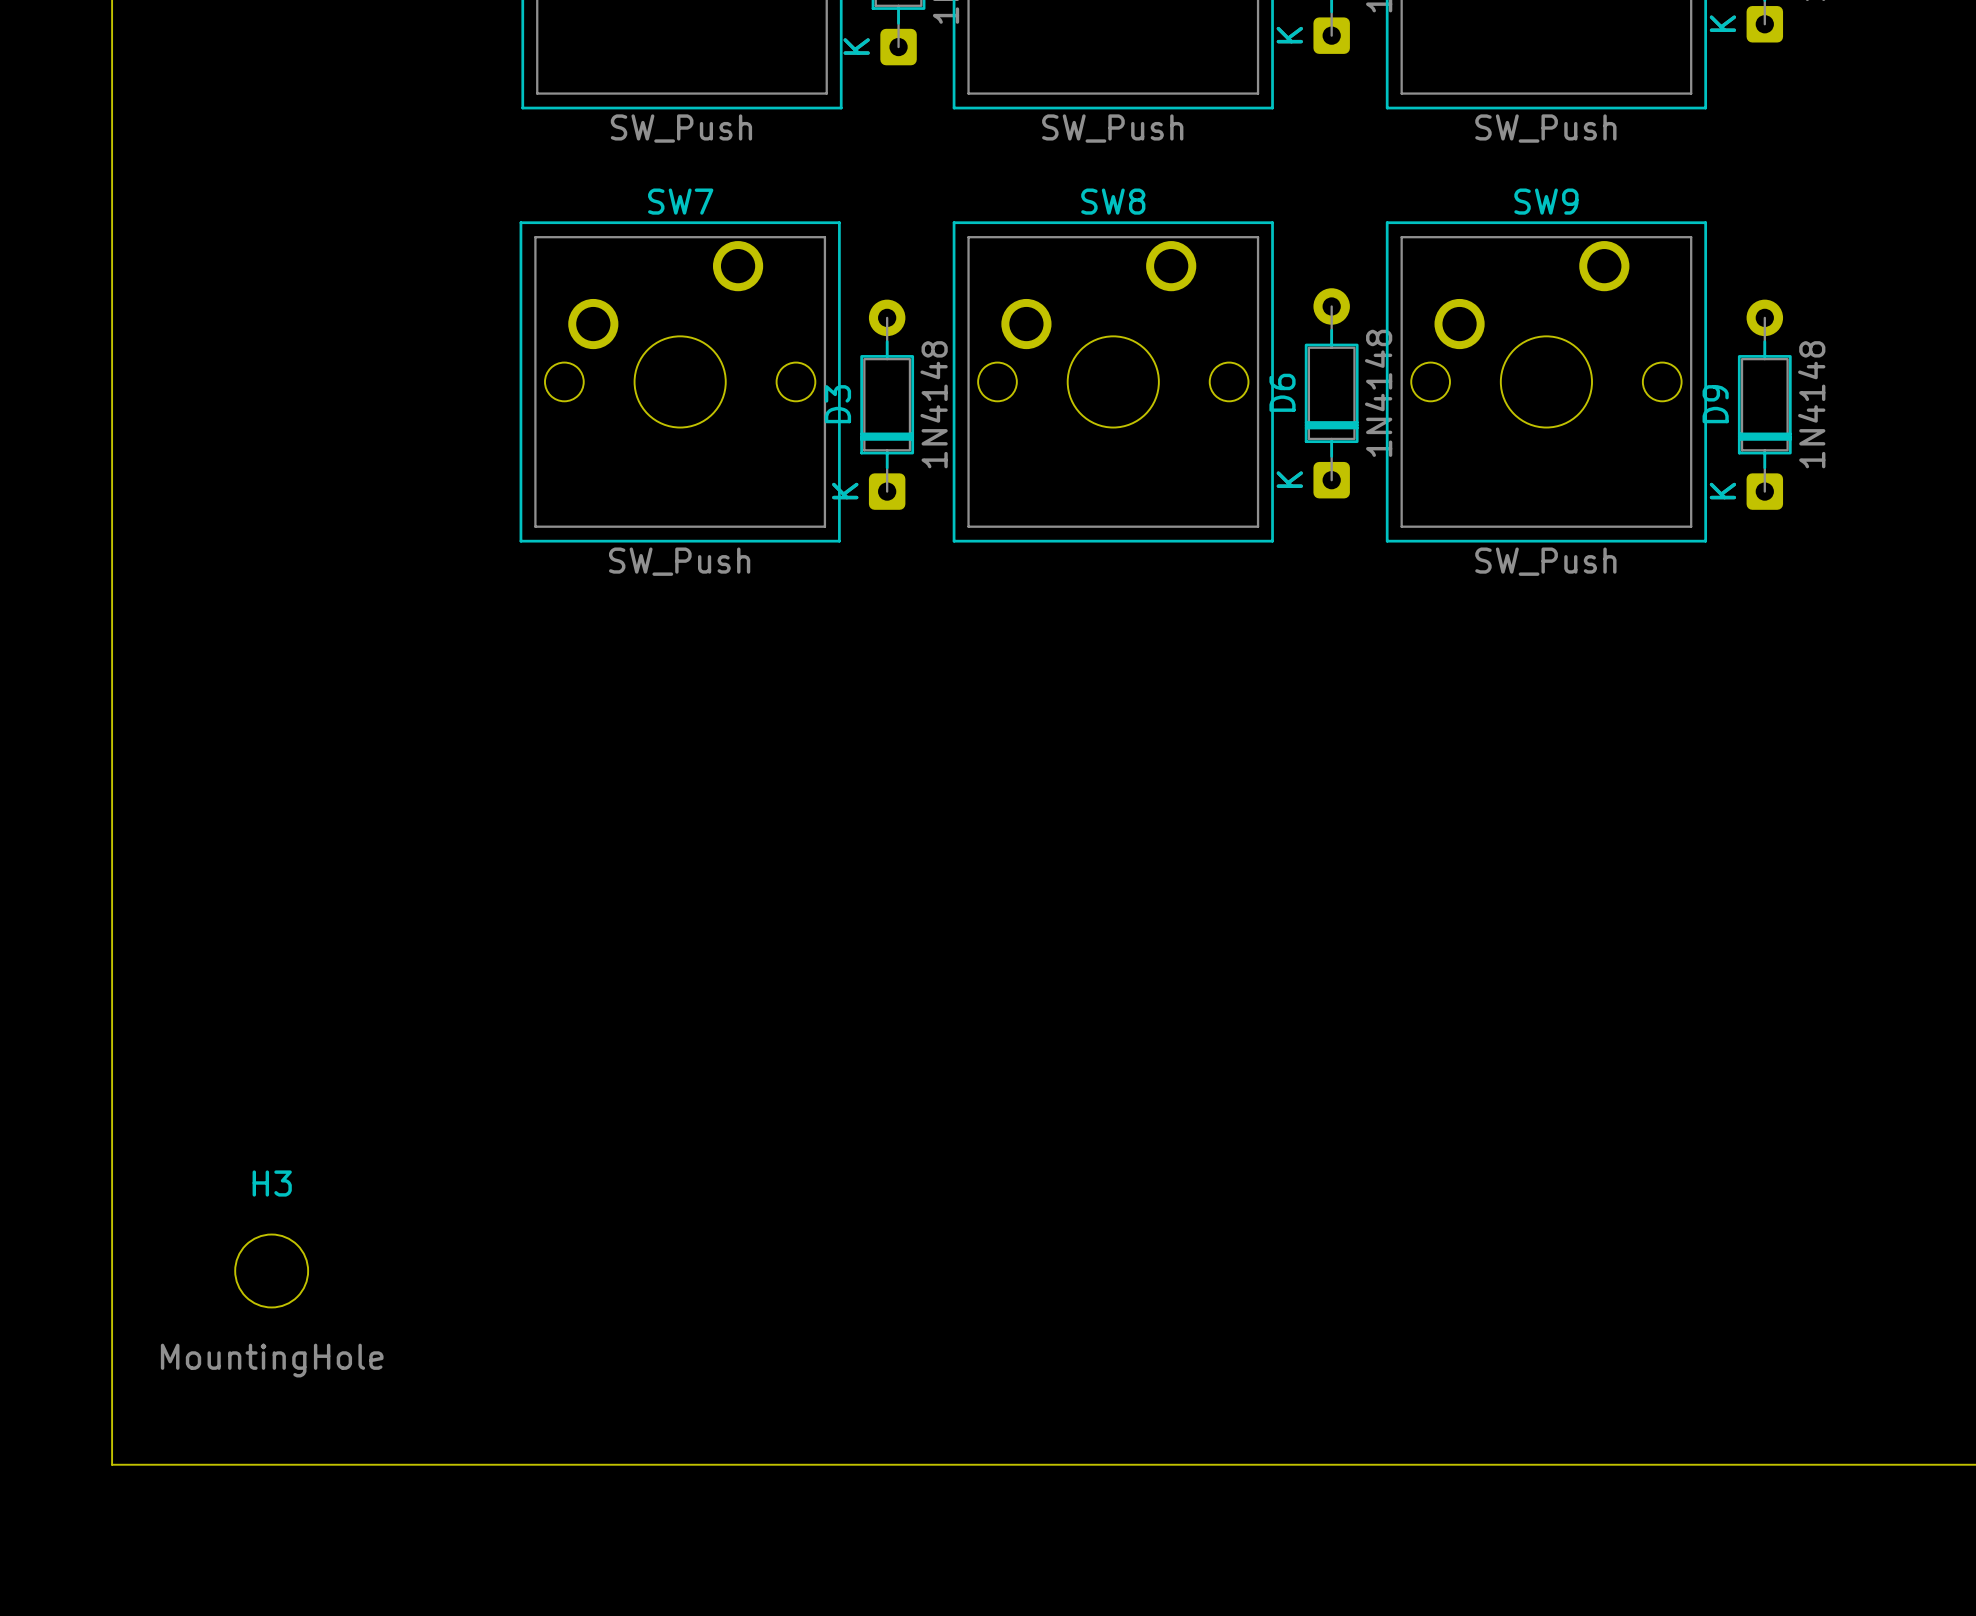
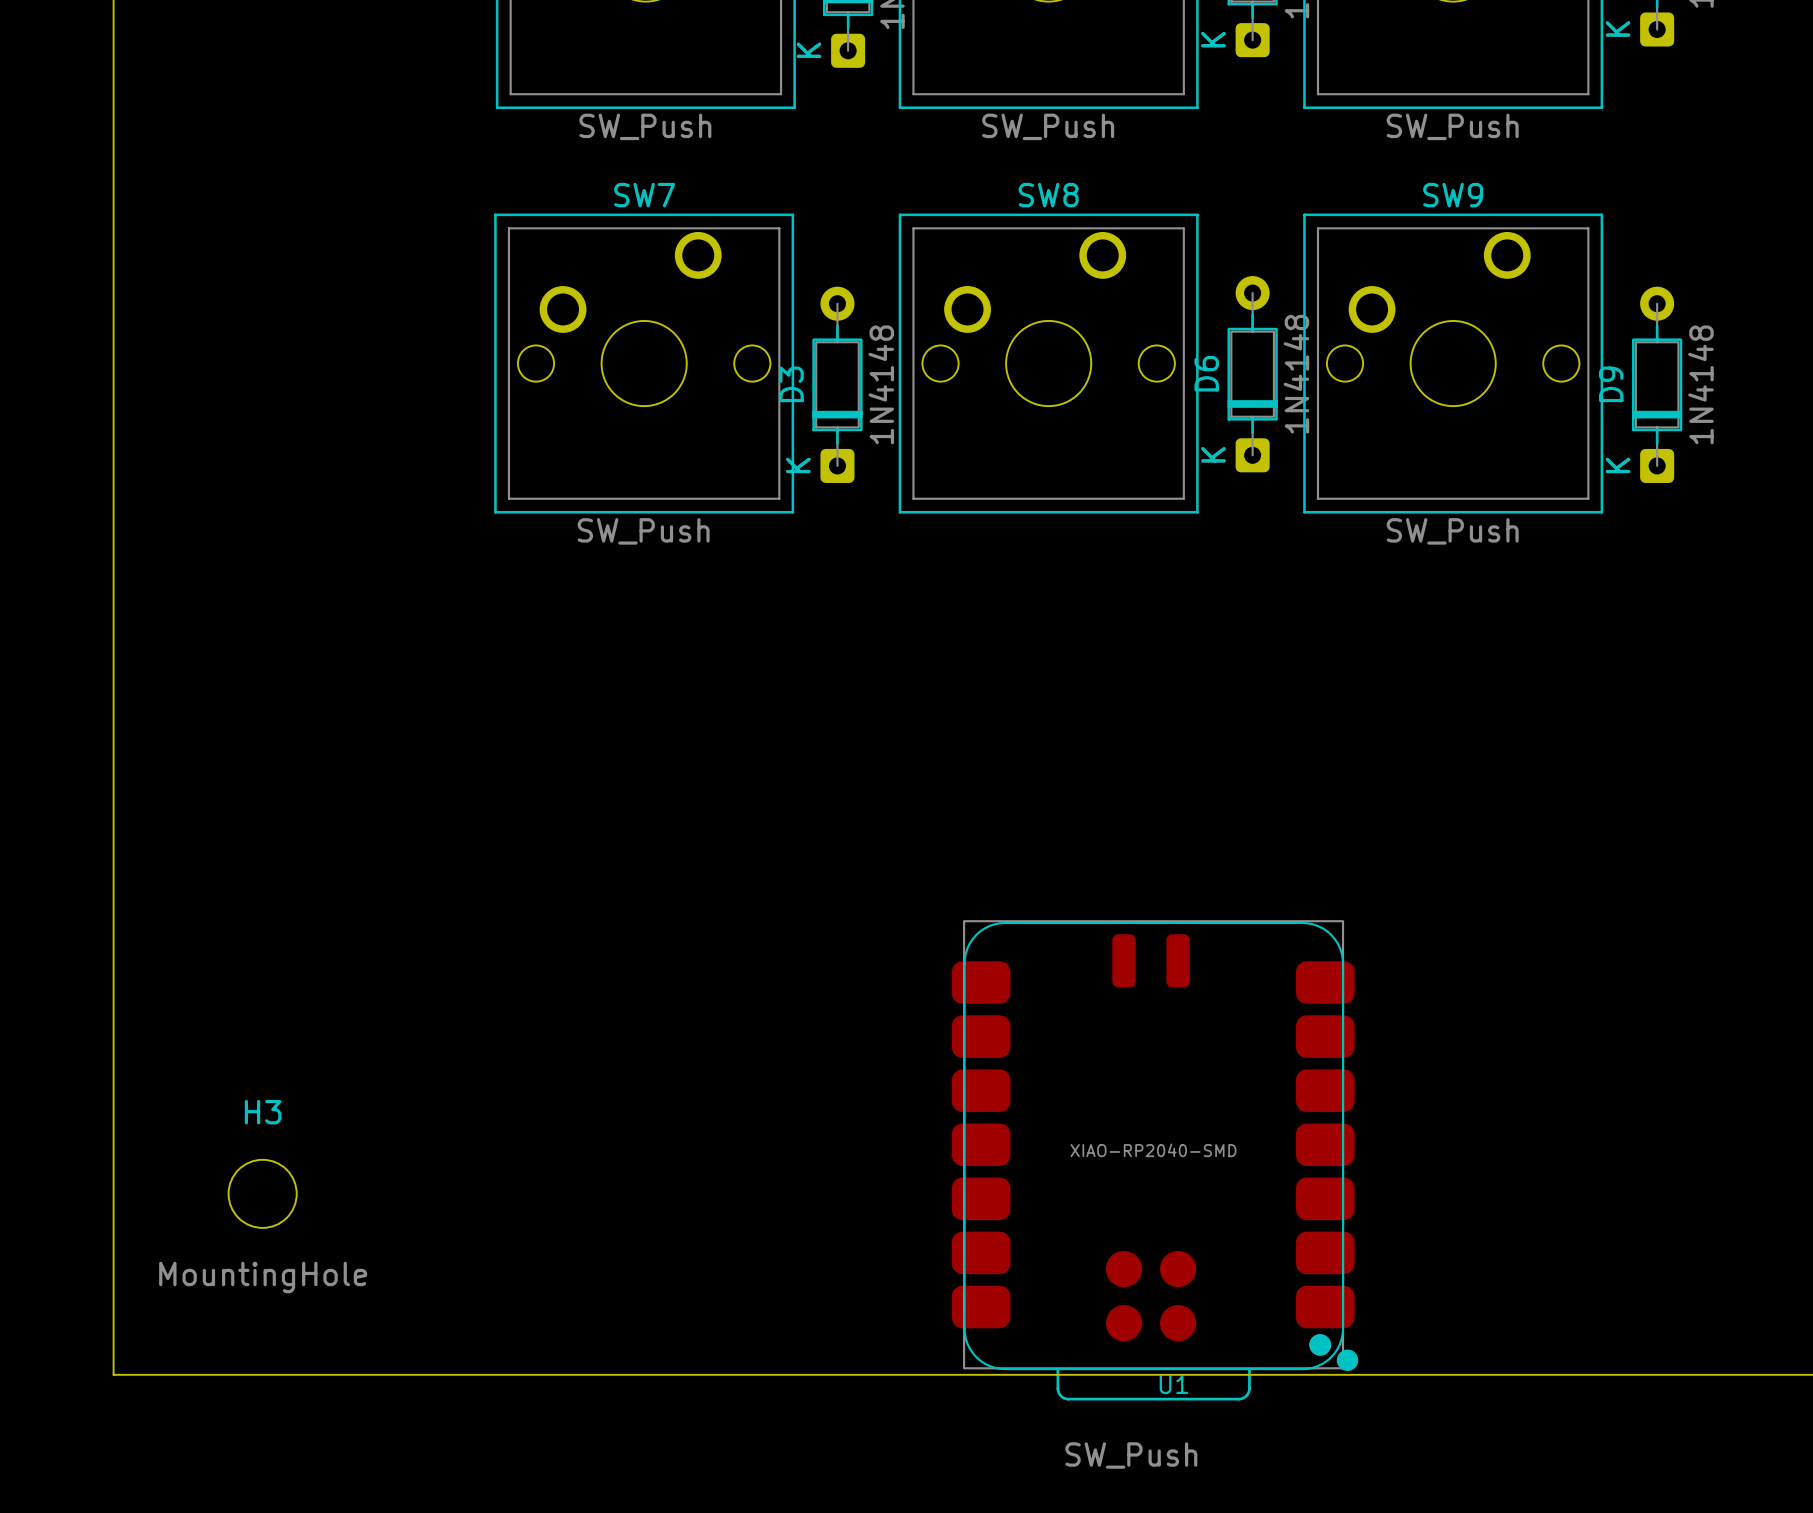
U1: none -> XIAO-RP2040-SMD (1155, 1160)
SW8 value: none -> SW_Push (1131, 1455)

